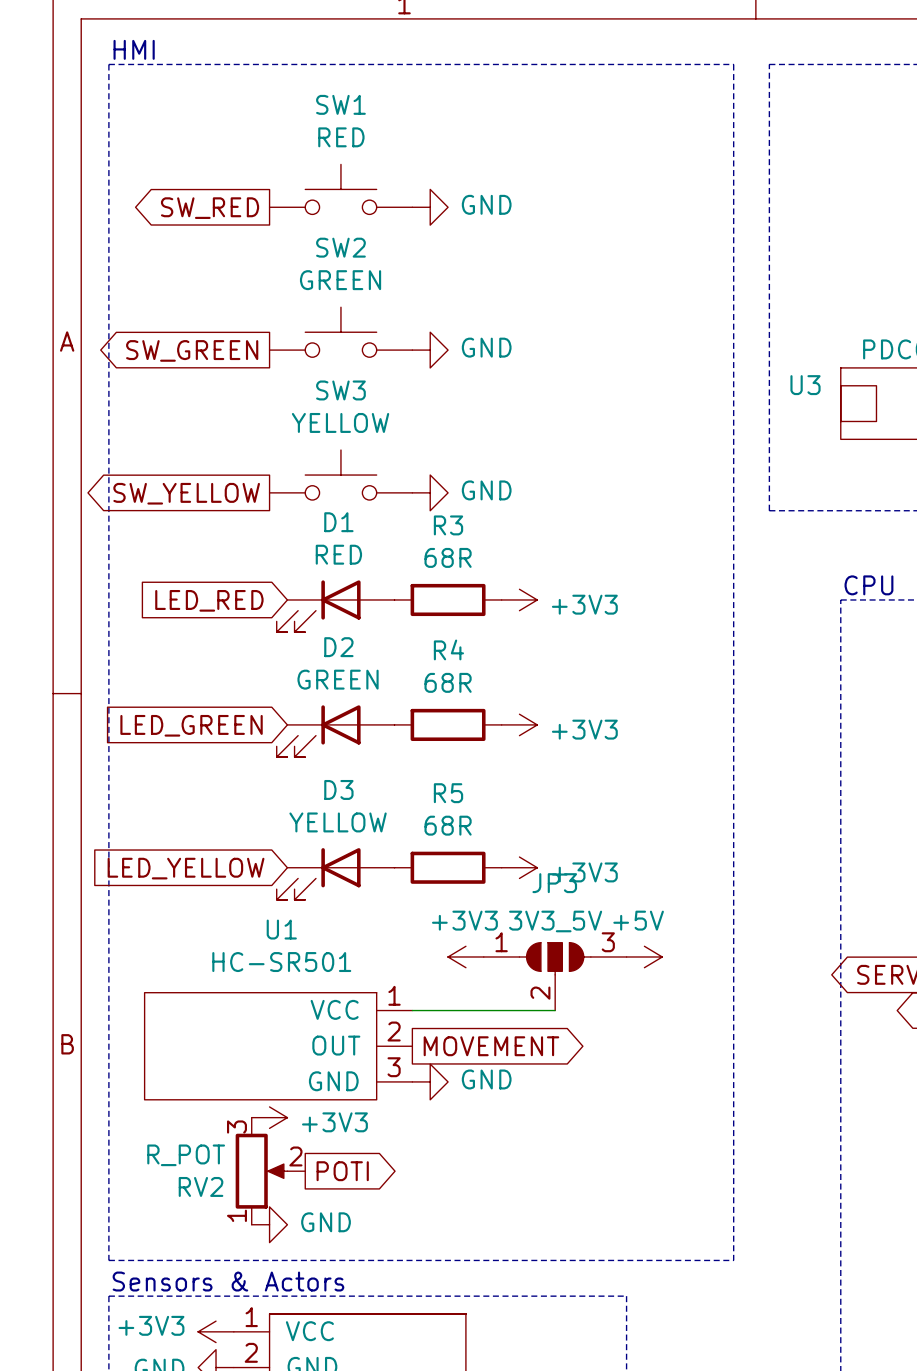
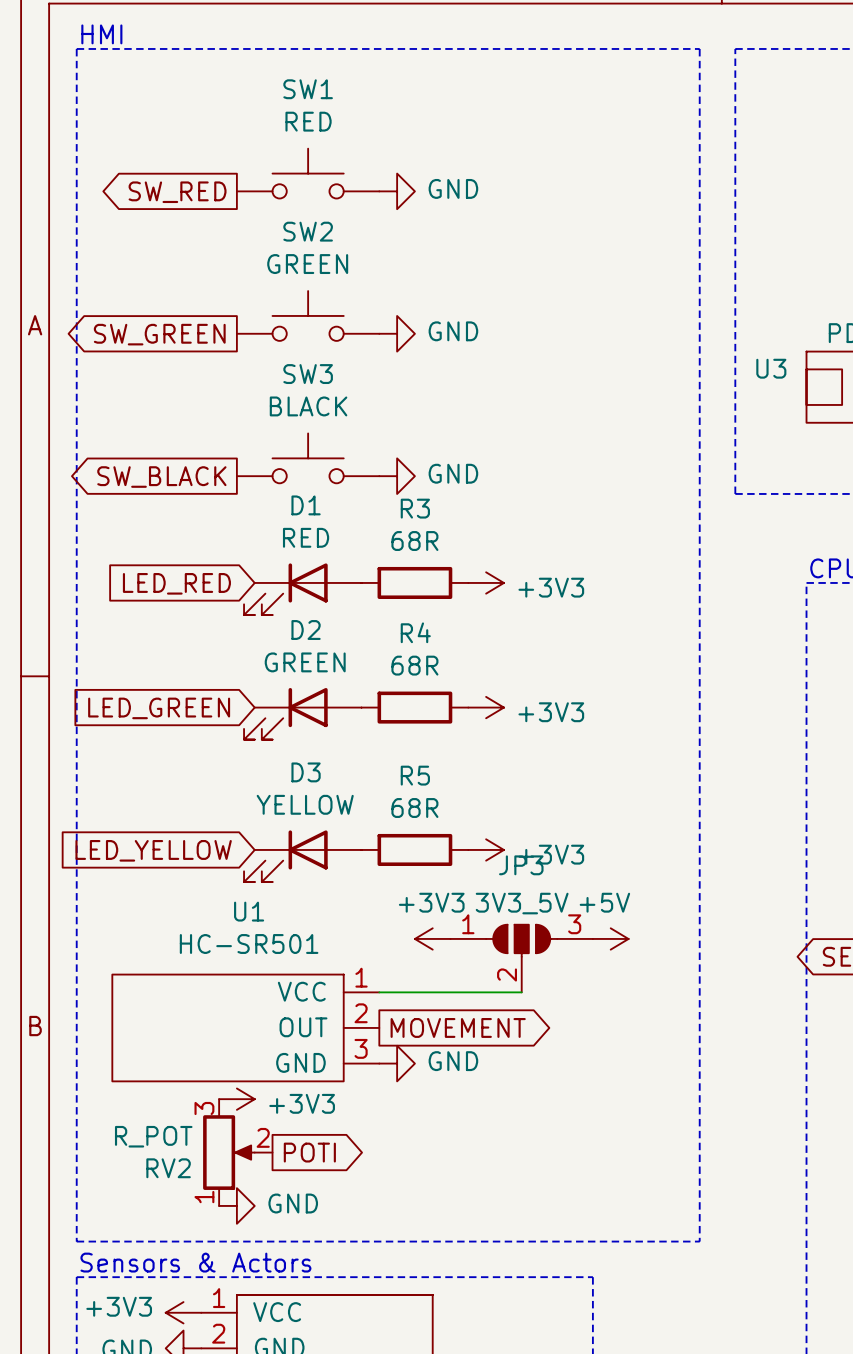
SW3 value: YELLOW (340, 422) -> BLACK (308, 406)
global label: SW_YELLOW (186, 493) -> SW_BLACK (161, 477)

